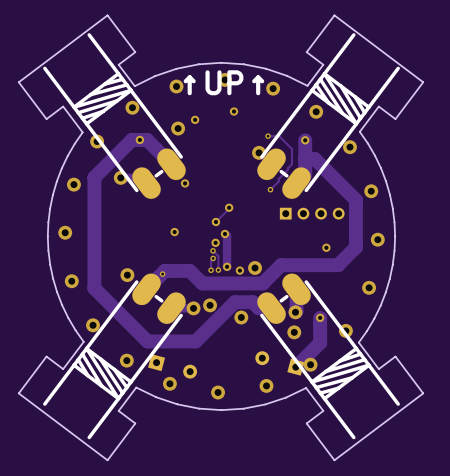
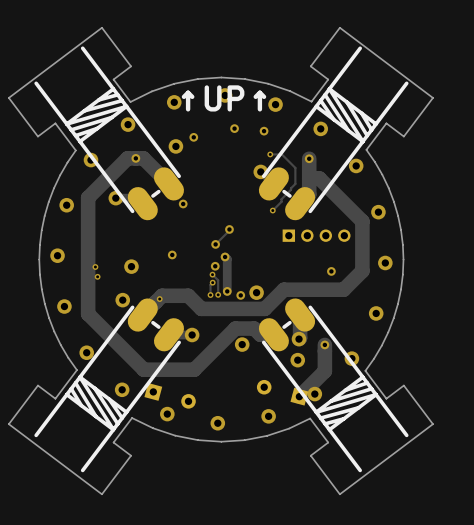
via: none -> (264, 131)
via: none -> (95, 266)
via: none -> (131, 266)
via: none -> (97, 276)
via: (210, 305) -> none

